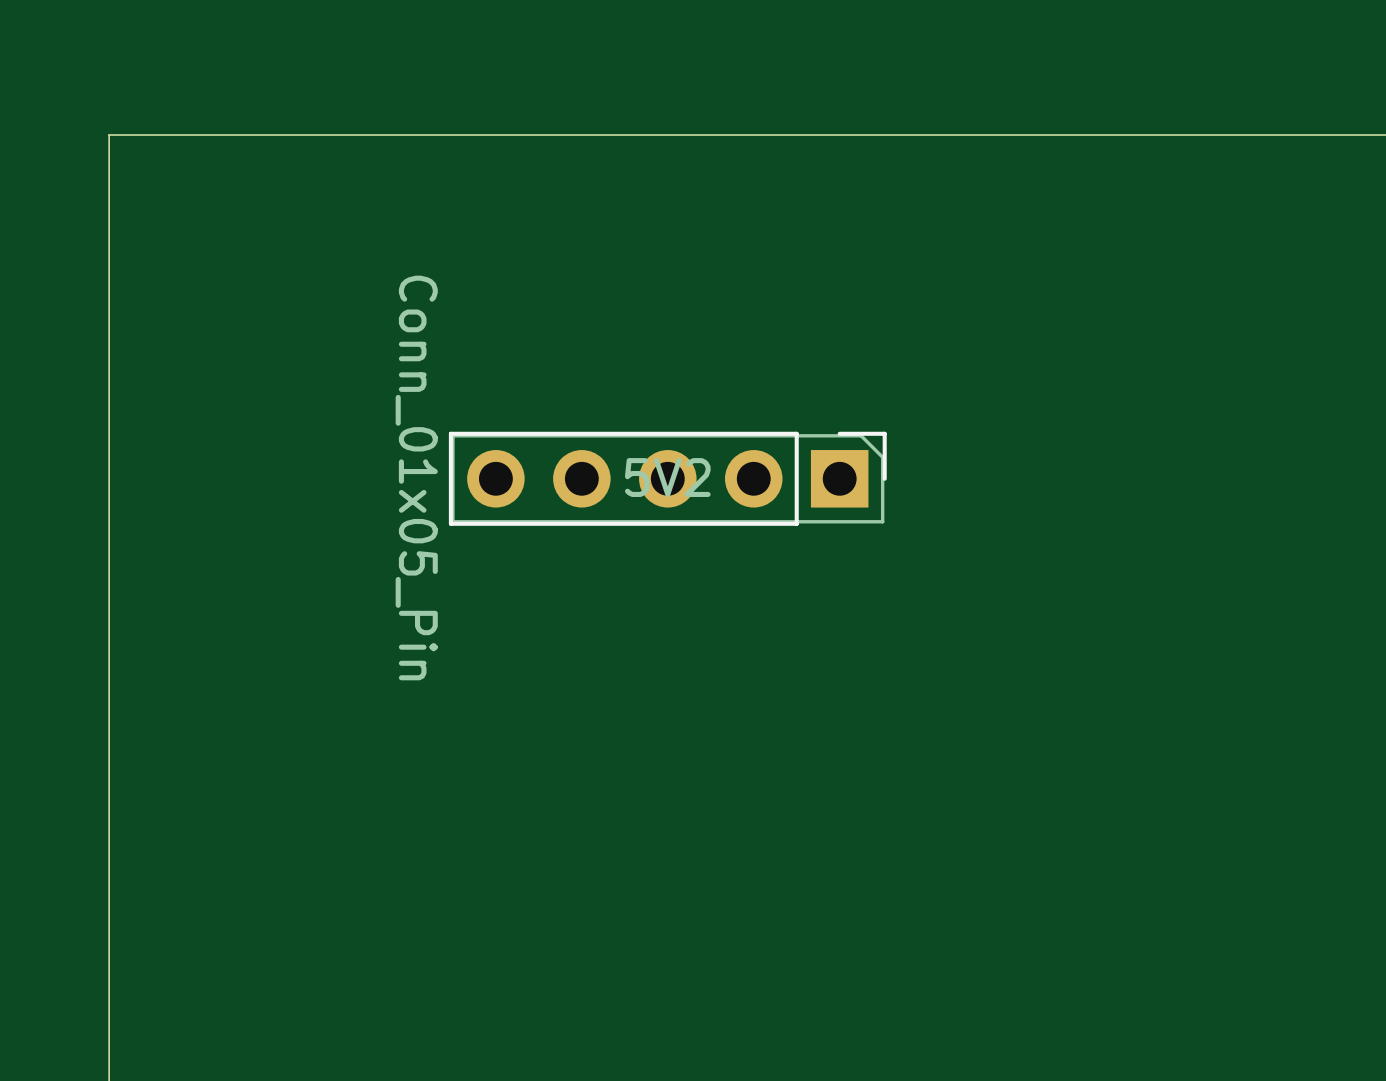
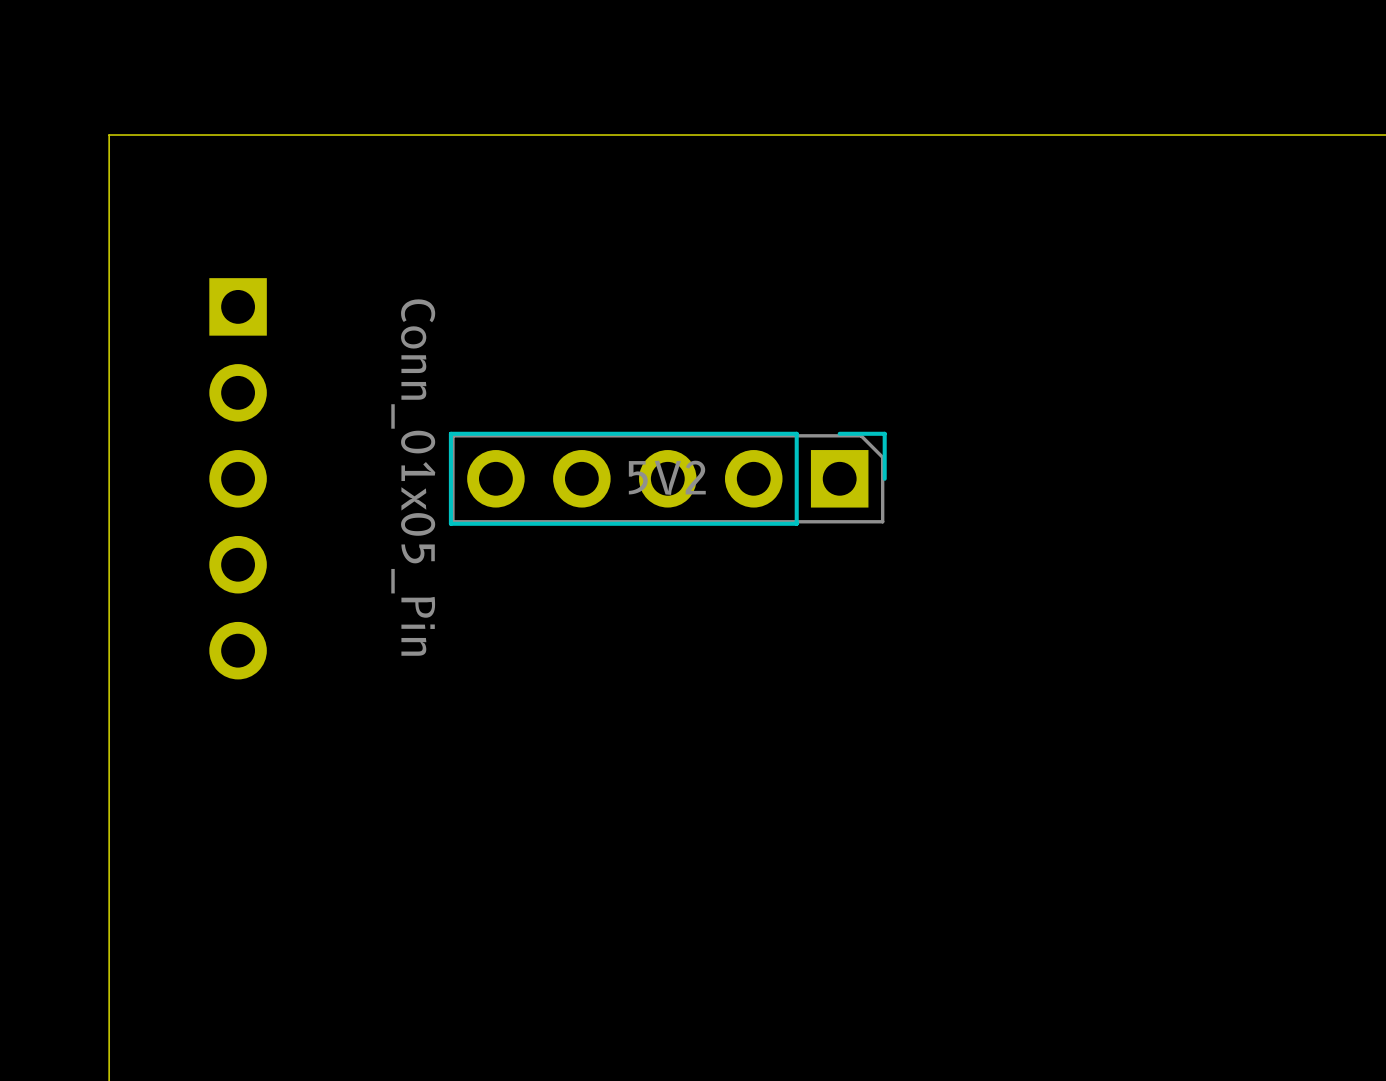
part: none -> (238, 478)

